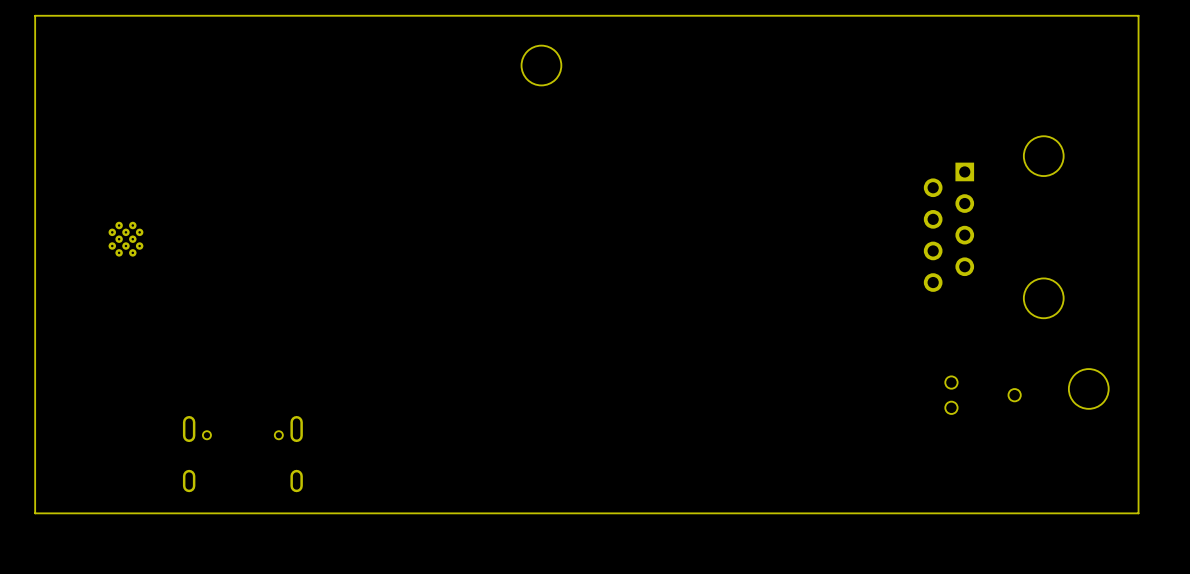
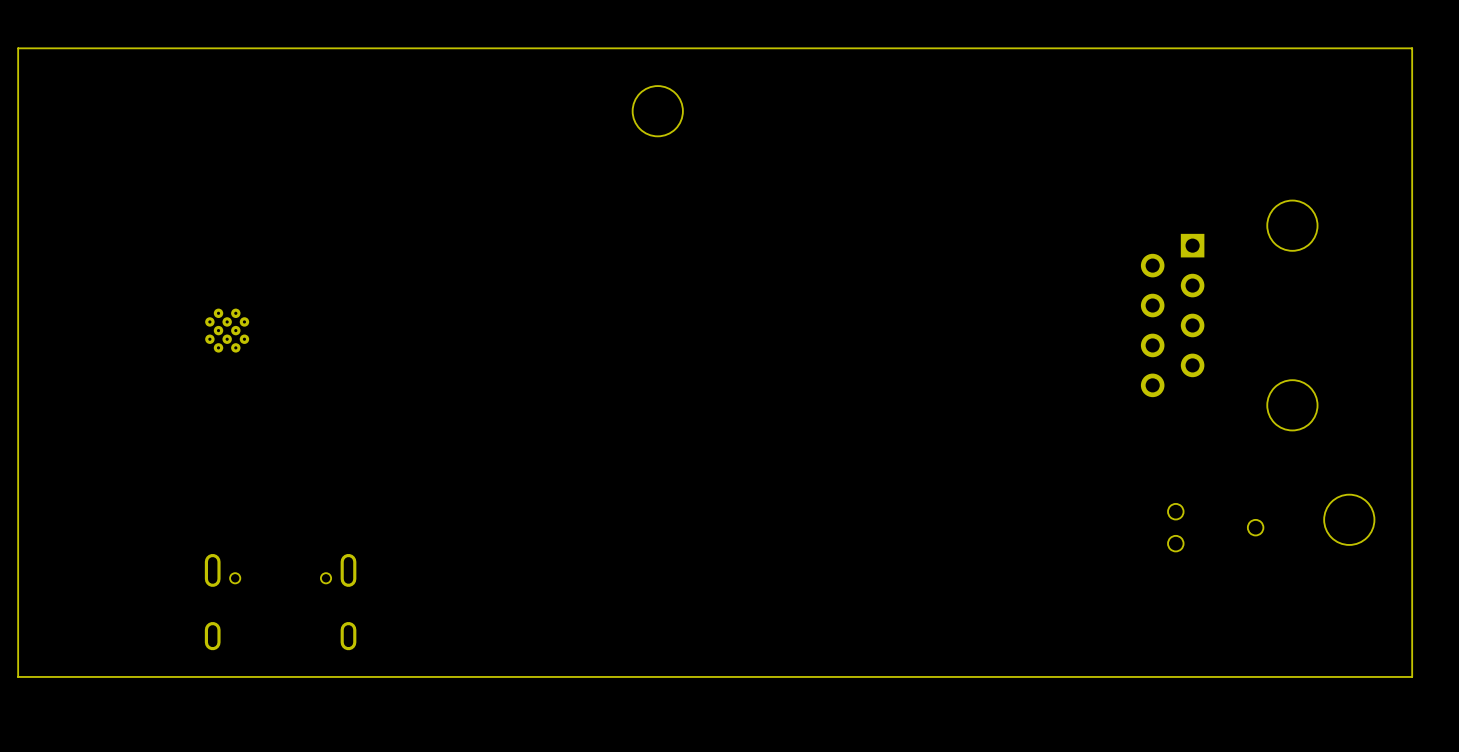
part position: (125, 239) -> (227, 330)

